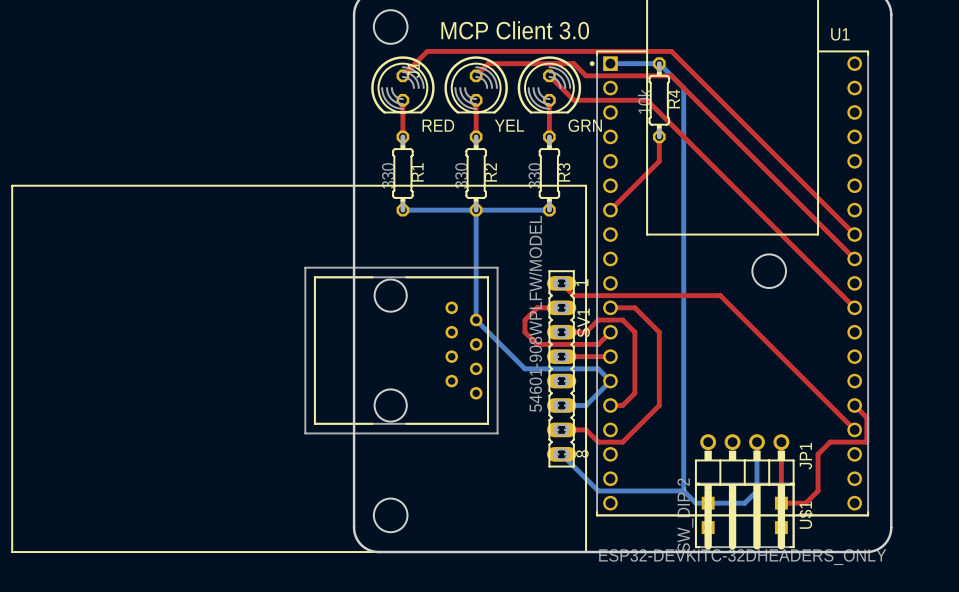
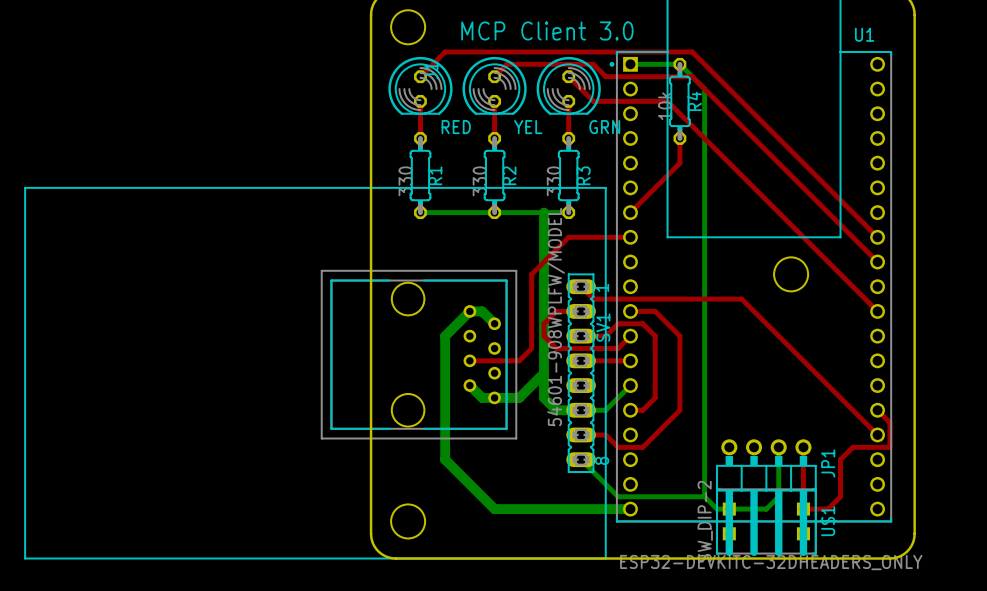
bottom track: (476, 210) (476, 320) (525, 368) (598, 368) (610, 381) -> none
bottom track: none -> (544, 212) (544, 397) (556, 410) (581, 410)
top track: none -> (630, 237) (568, 237) (531, 274) (531, 348) (519, 360) (469, 360)
bottom track: none -> (494, 323) (482, 311) (469, 311) (445, 336) (445, 459) (494, 509) (630, 509)
bottom track: none -> (544, 373) (519, 397) (482, 397) (469, 385)

